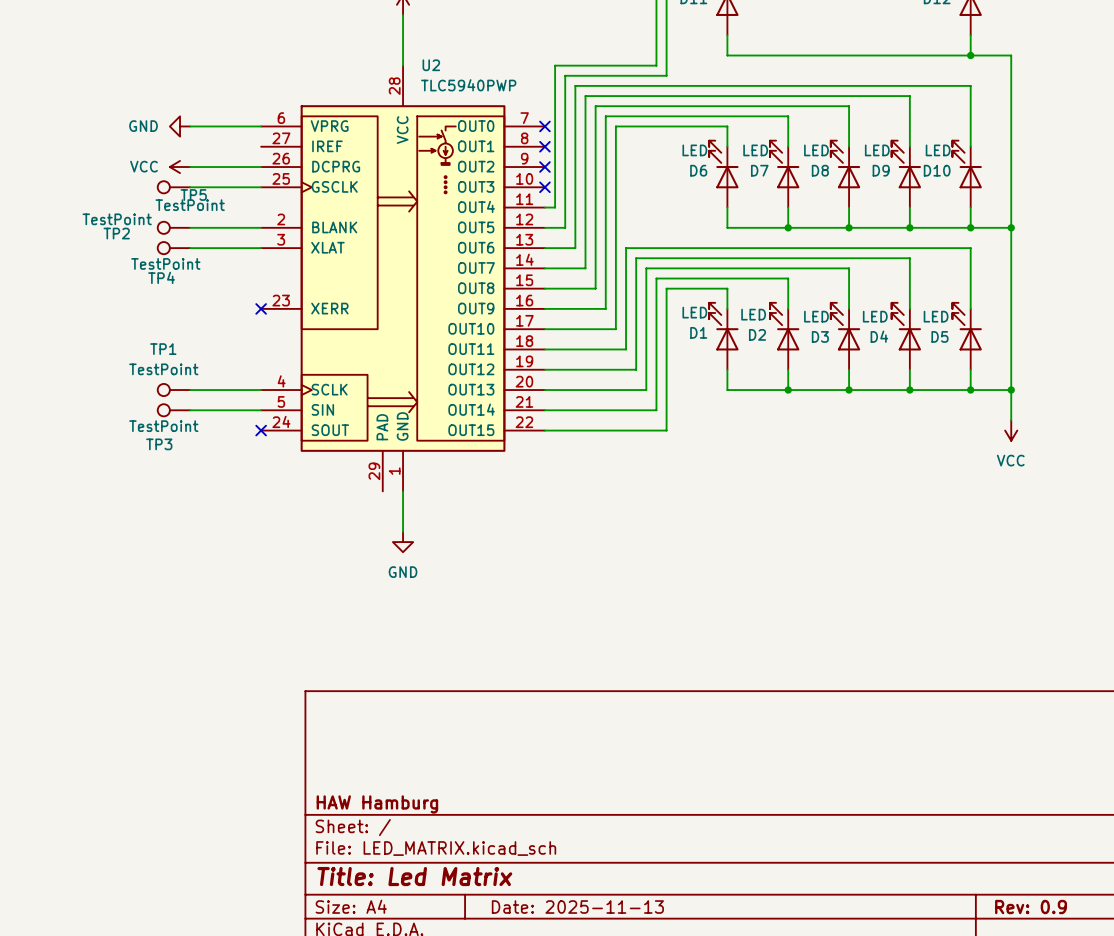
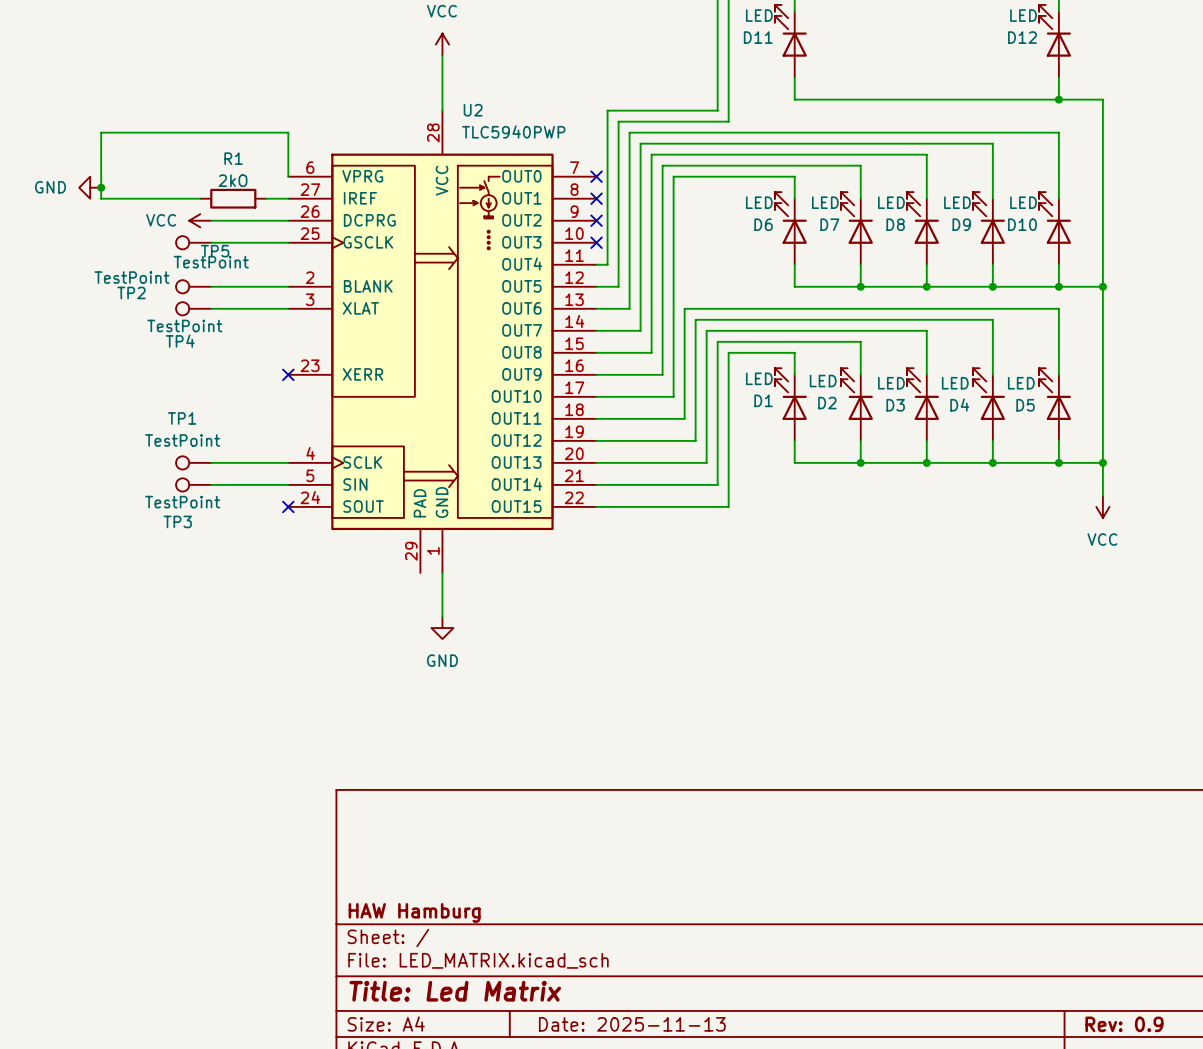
power symbol position: GND (180, 126) -> GND (90, 187)
wire: (190, 126) (261, 126) -> (200, 198) (101, 198) (101, 132) (288, 132) (288, 176)
junction: none -> (101, 187)
R1: none -> 2kO (233, 198)
wire: none -> (266, 198) (288, 198)

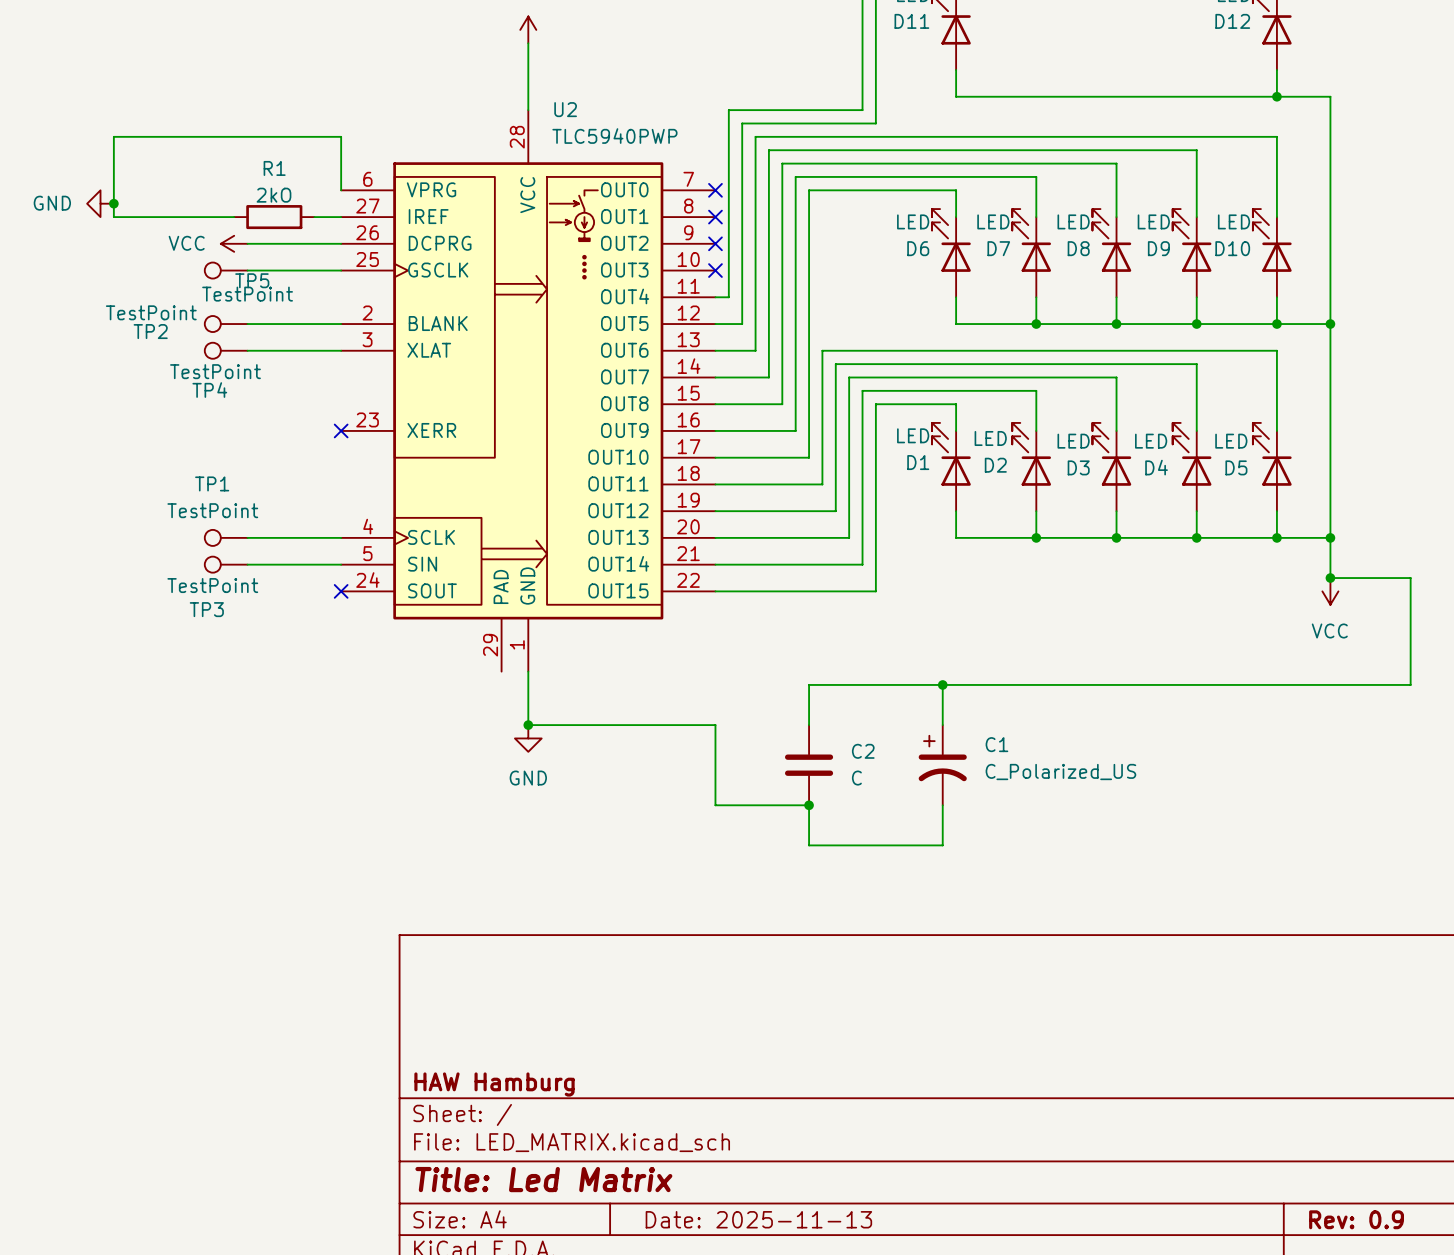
wire: none -> (1330, 578) (1410, 578) (1410, 684) (809, 684) (809, 725)
junction: none -> (1330, 578)
wire: none -> (942, 684) (942, 725)
junction: none -> (942, 684)
wire: none -> (528, 725) (715, 725) (715, 805) (809, 805) (809, 845) (942, 845) (942, 805)
junction: none -> (528, 725)
C2: none -> C (809, 765)
C1: none -> C_Polarized_US (942, 765)
junction: none -> (809, 805)

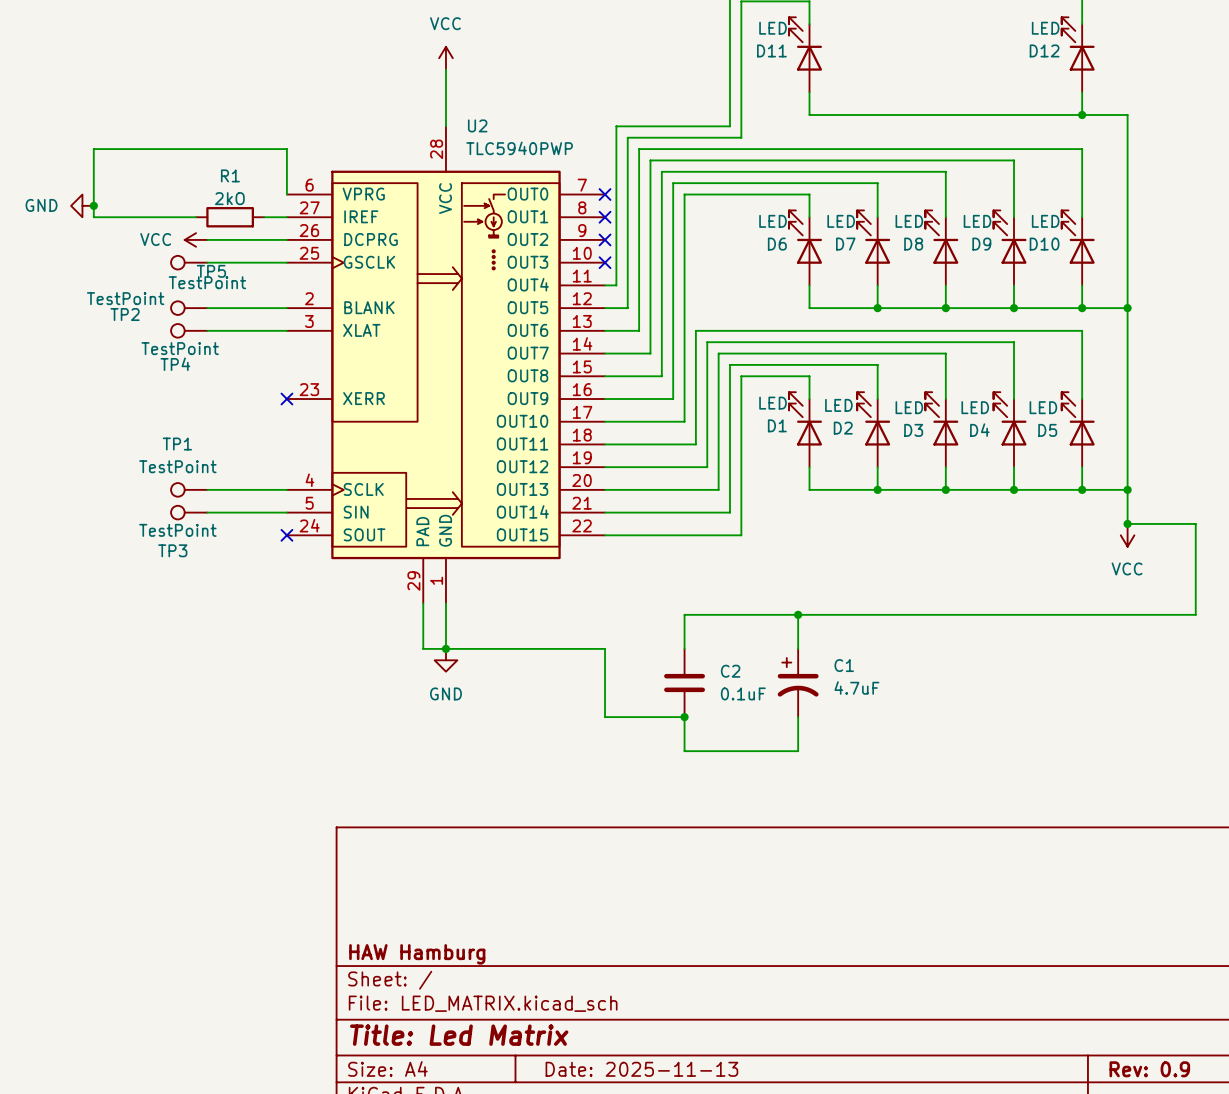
wire: none -> (423, 603) (423, 648) (445, 648)
C1 value: C_Polarized_US (1060, 772) -> 4.7uF (856, 687)
C2 value: C (856, 778) -> 0.1uF (743, 693)

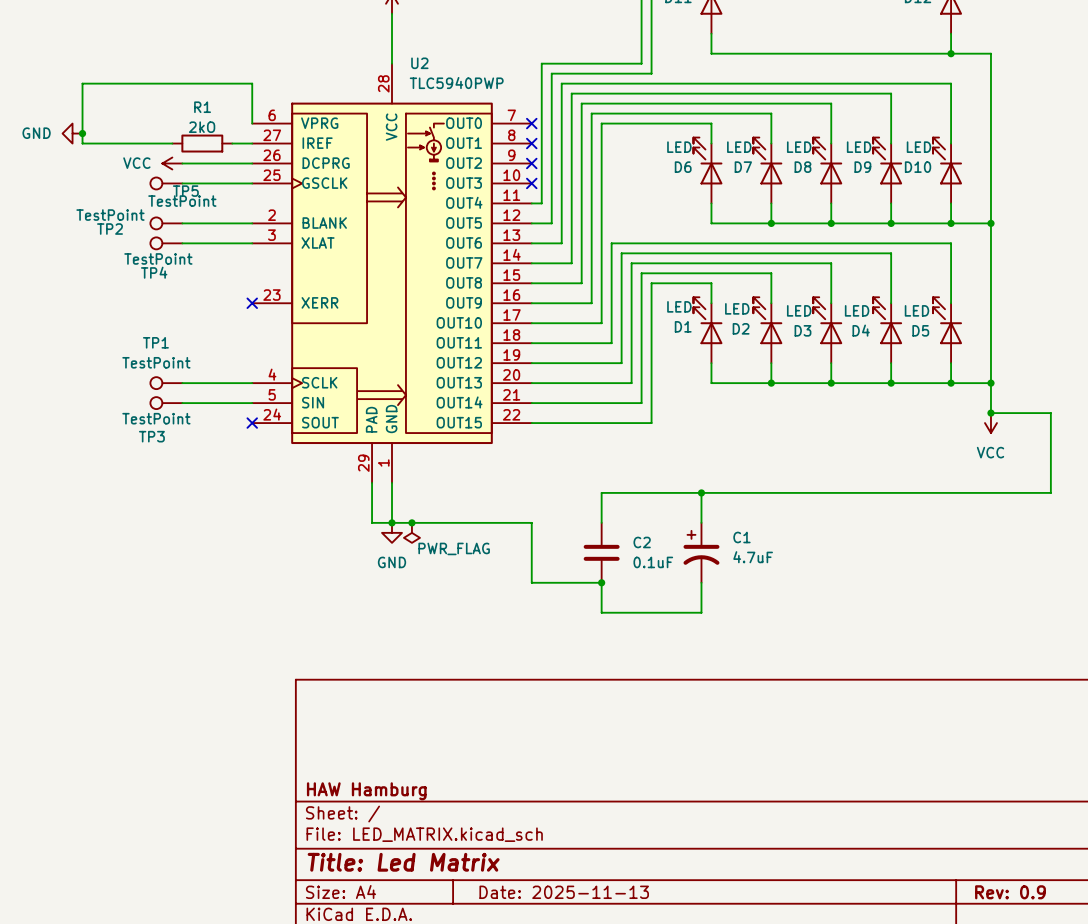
junction: none -> (411, 522)
power symbol: none -> PWR_FLAG (411, 532)

